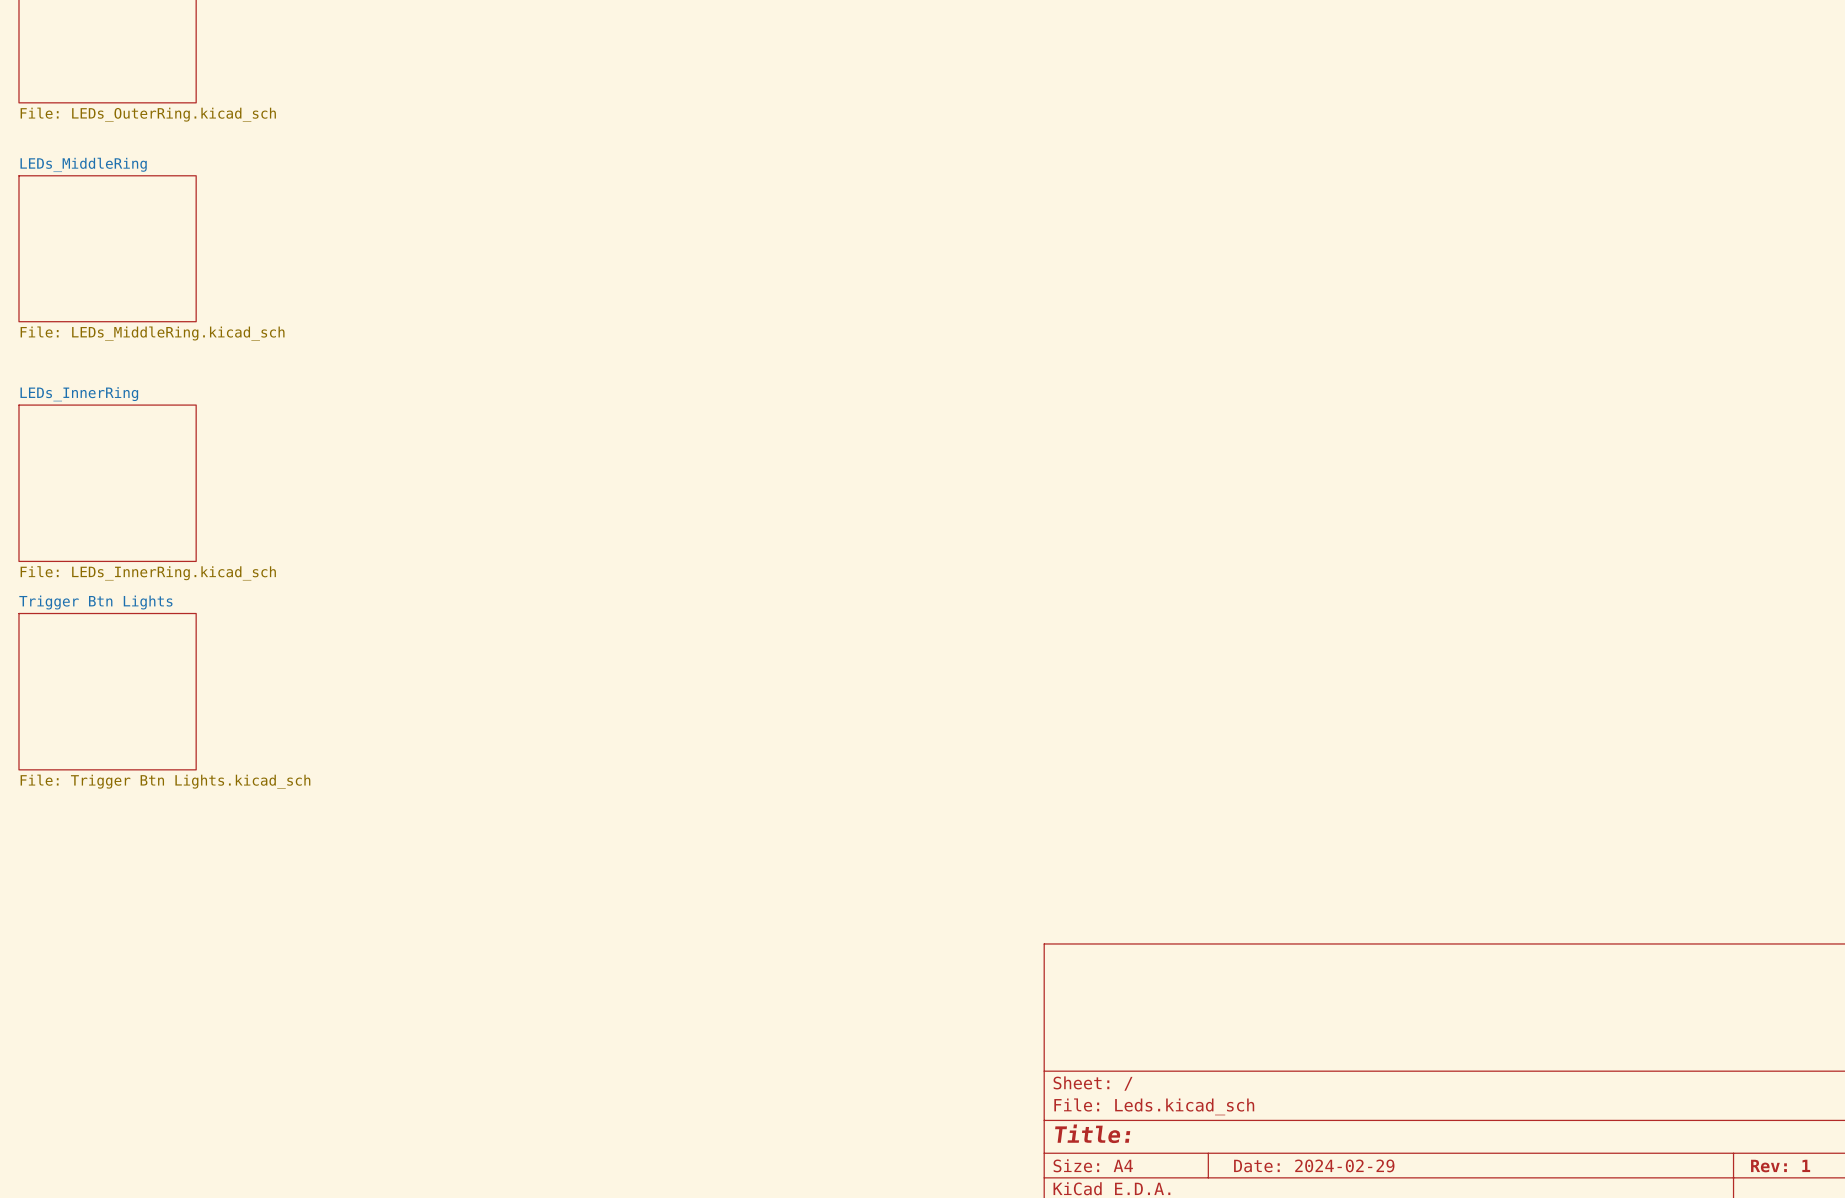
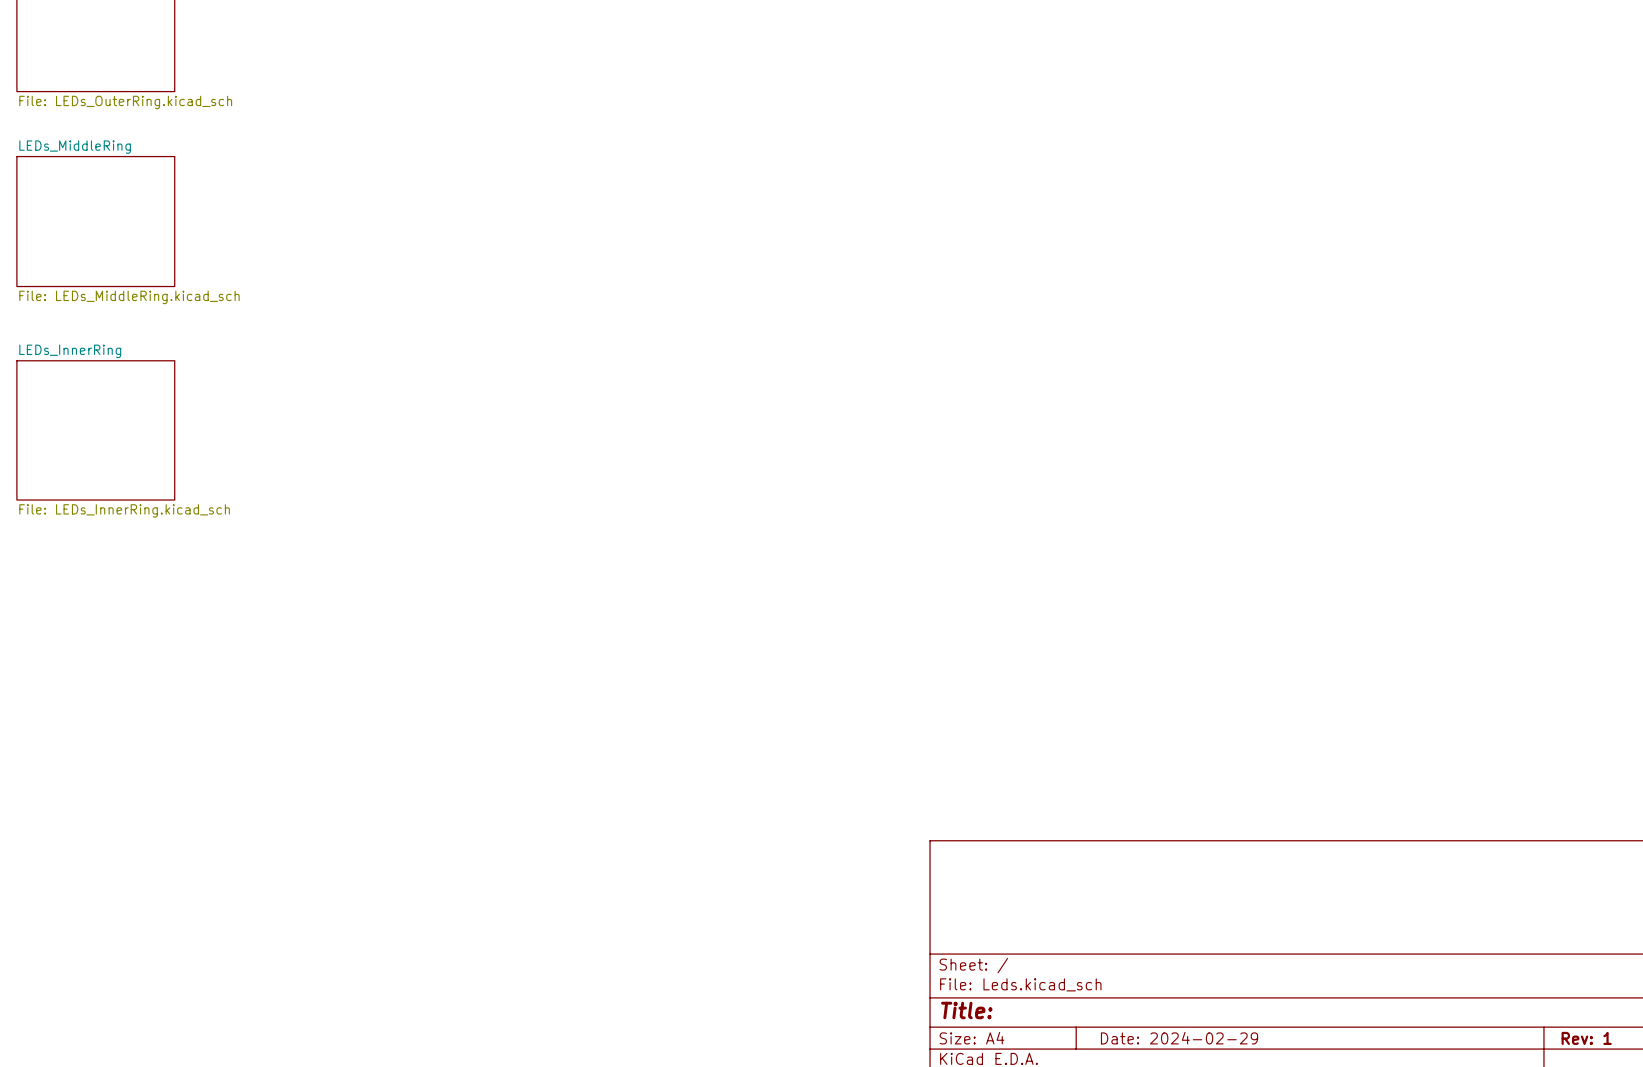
sheet Trigger Btn Lights: File: Trigger Btn Lights.kicad_sch (107, 691) -> none

